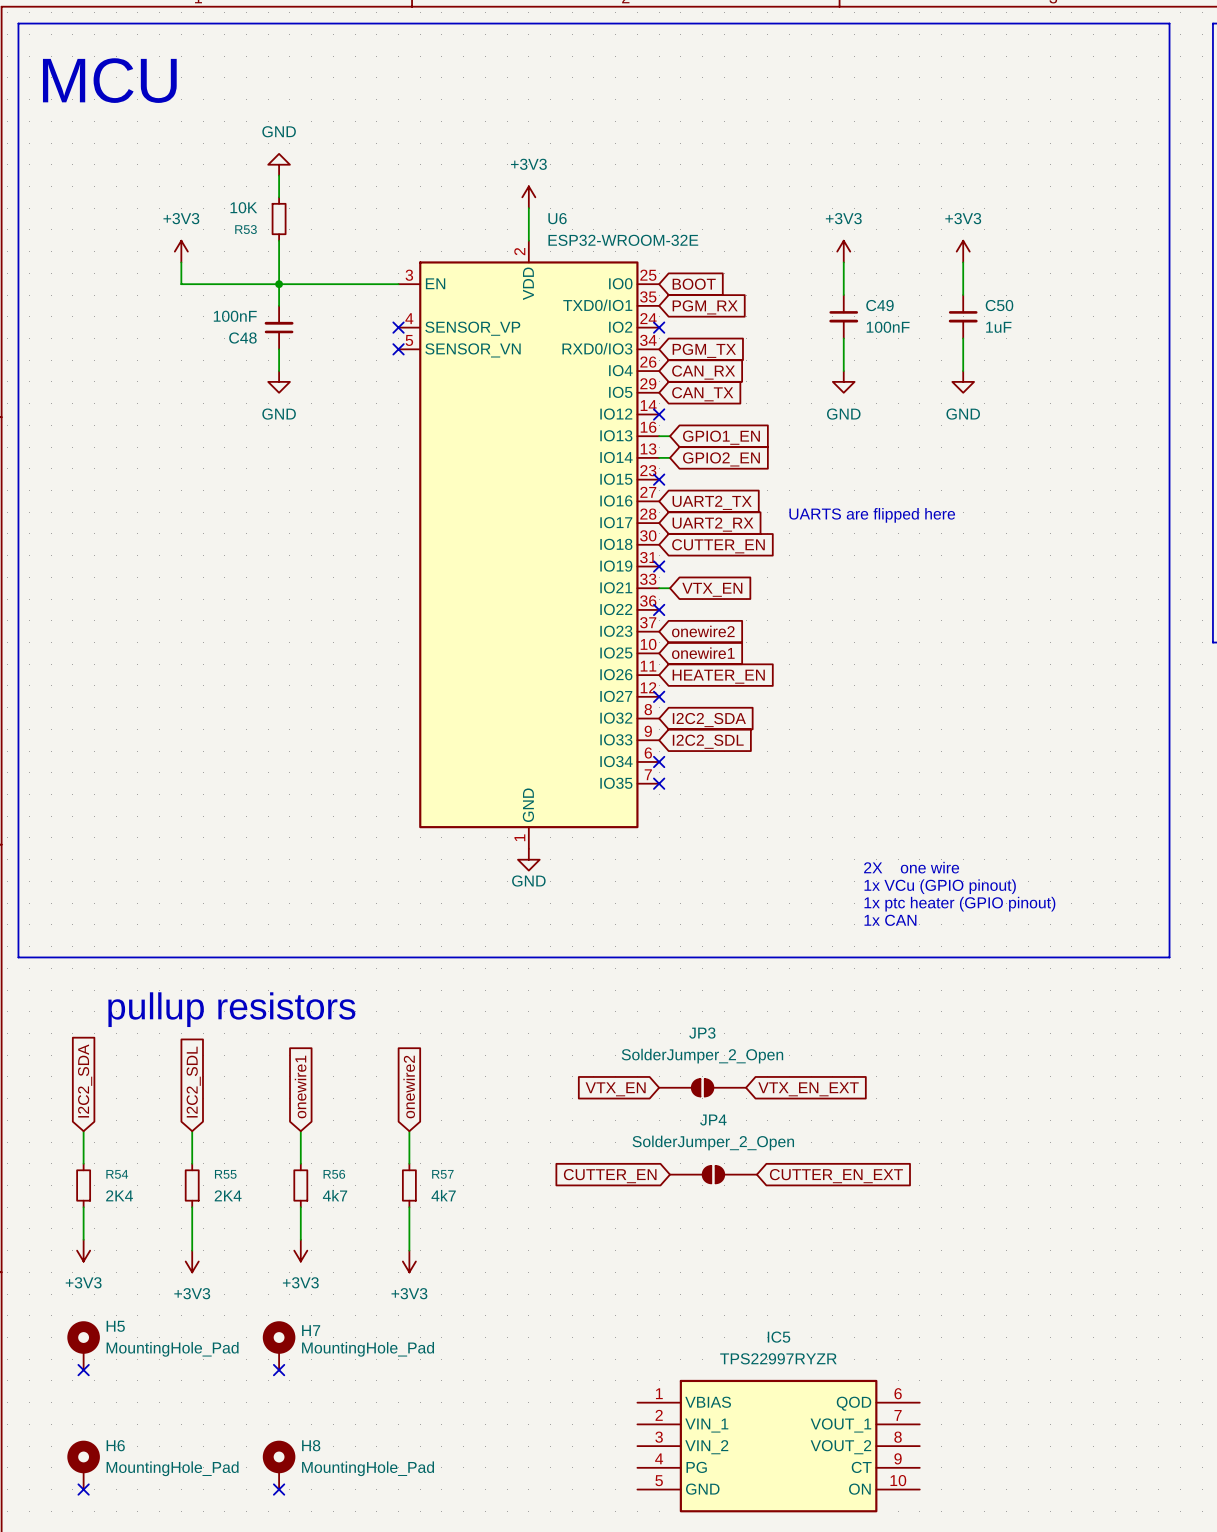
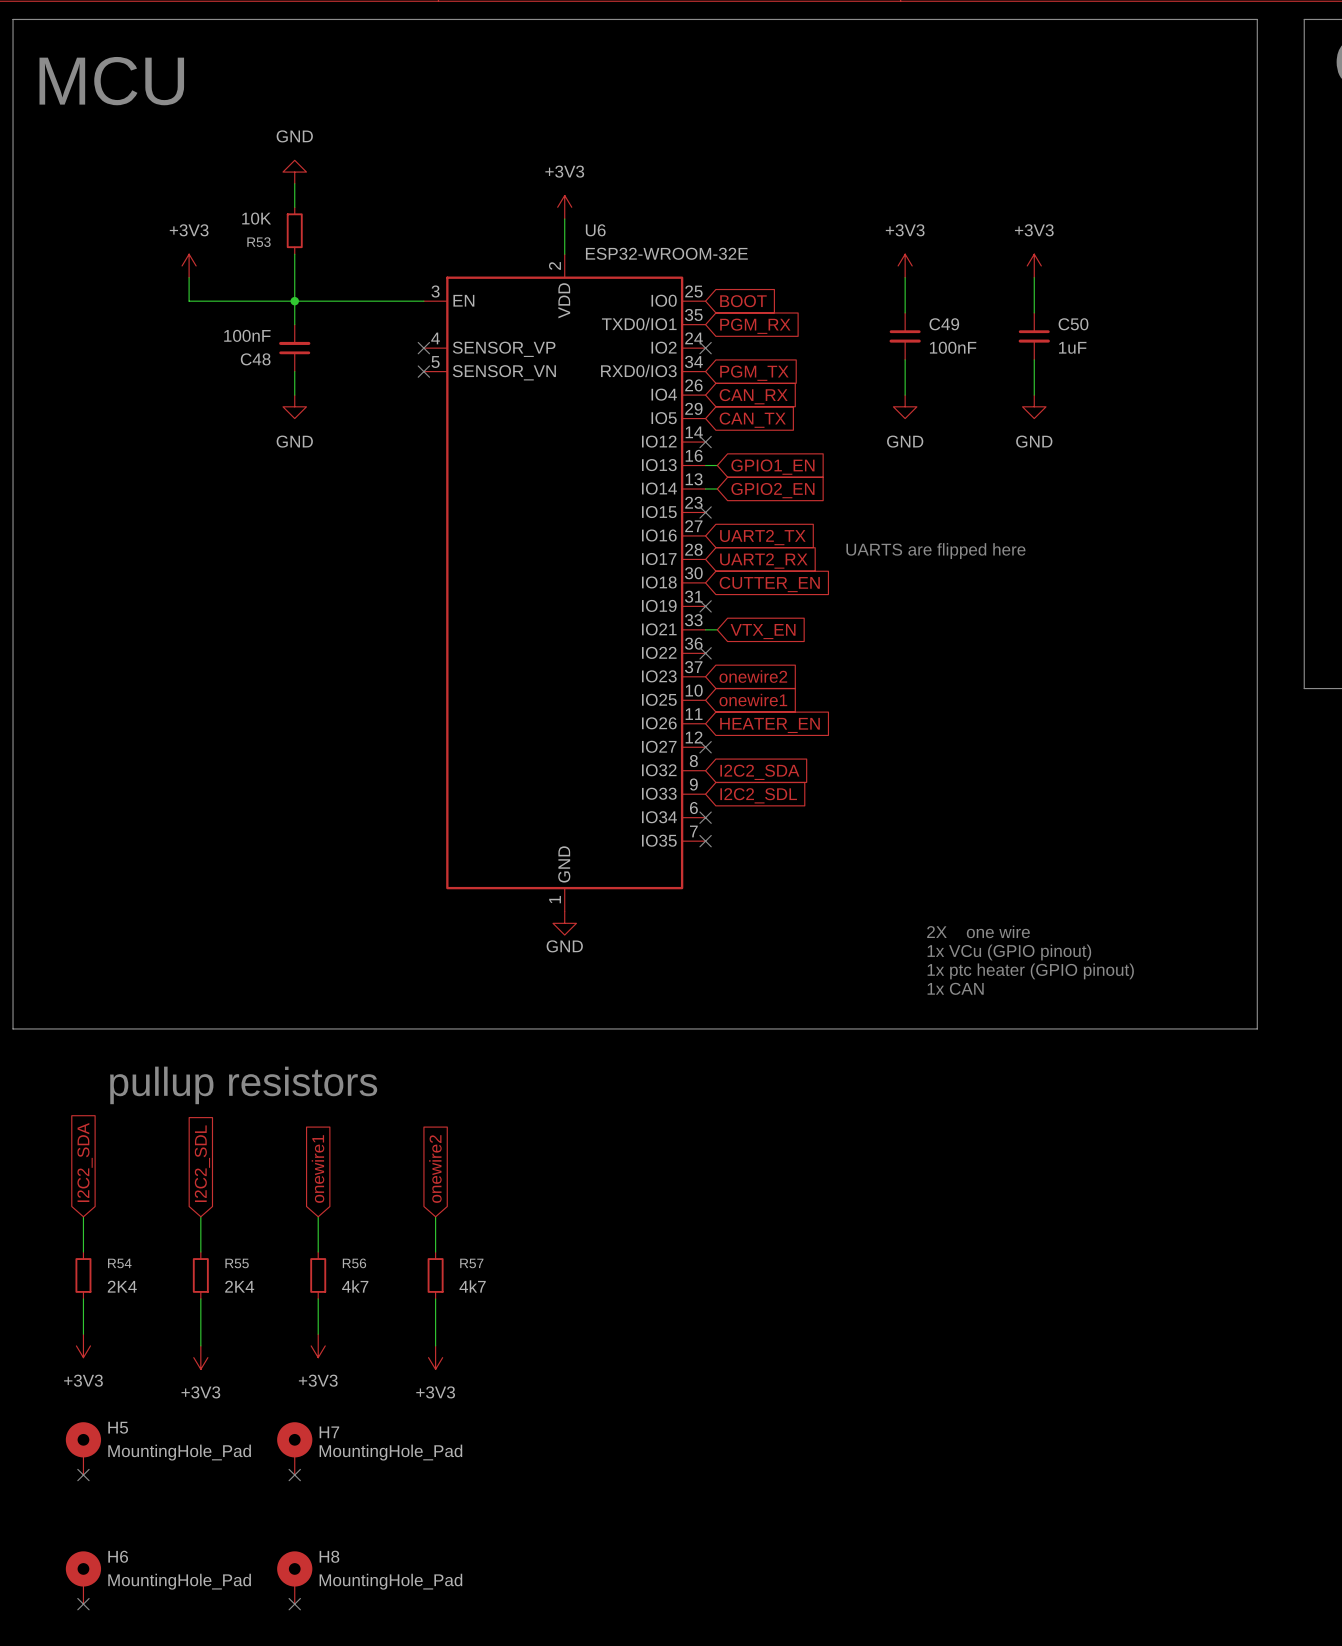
JP3: SolderJumper_2_Open (702, 1087) -> none
global label: VTX_EN (615, 1089) -> none
global label: VTX_EN_EXT (808, 1089) -> none
JP4: SolderJumper_2_Open (713, 1174) -> none
global label: CUTTER_EN (610, 1176) -> none
global label: CUTTER_EN_EXT (836, 1176) -> none
IC5: TPS22997RYZR (778, 1446) -> none

